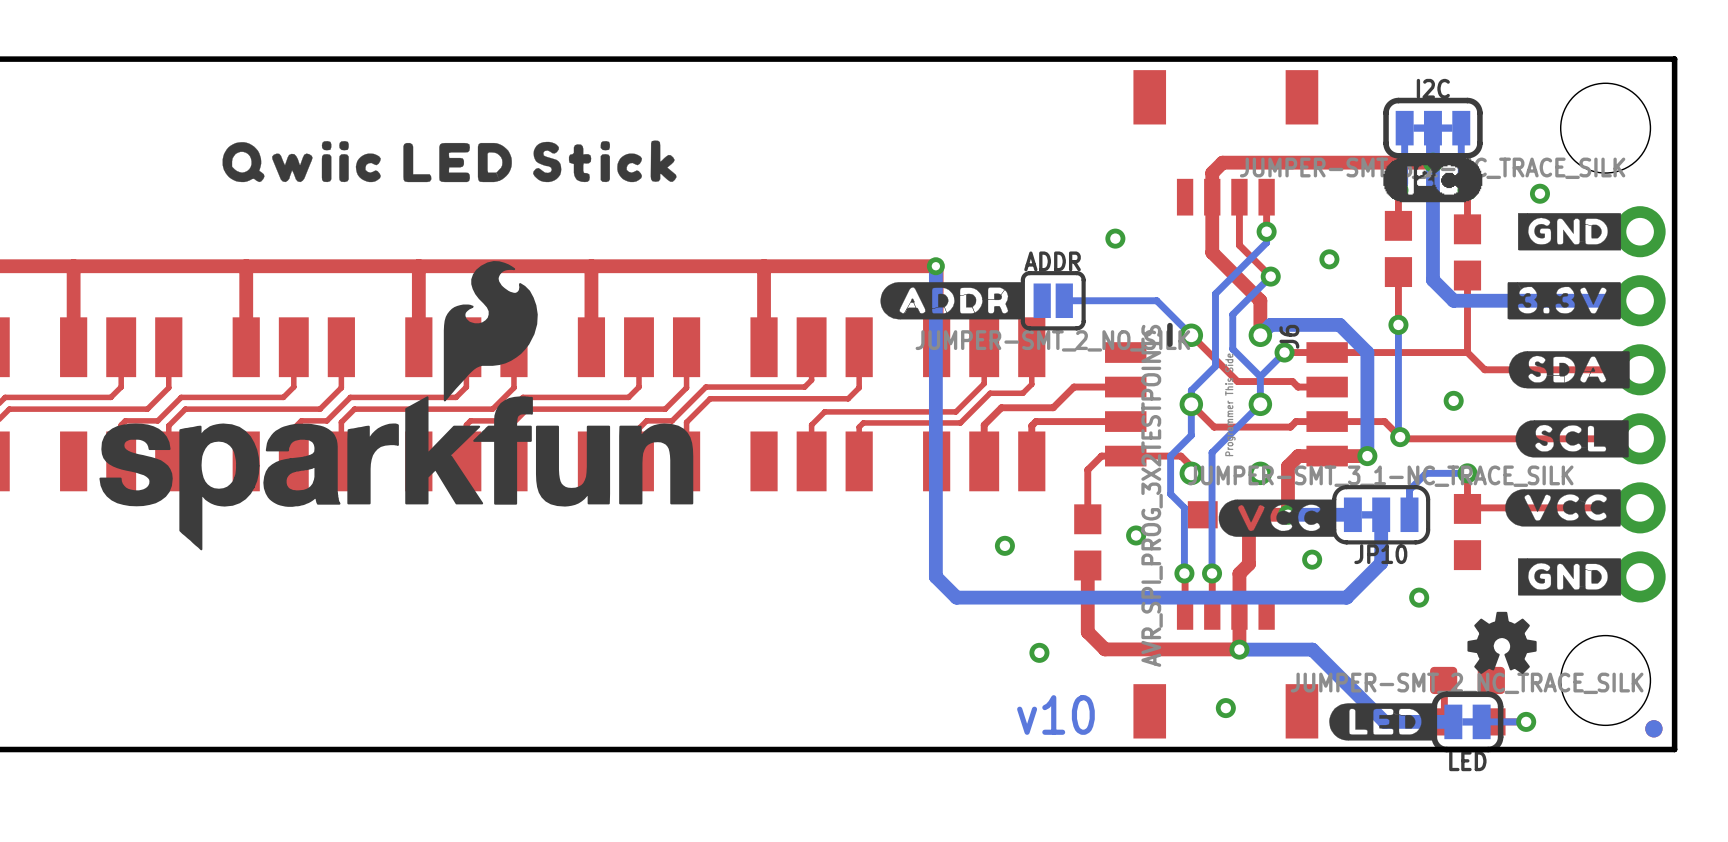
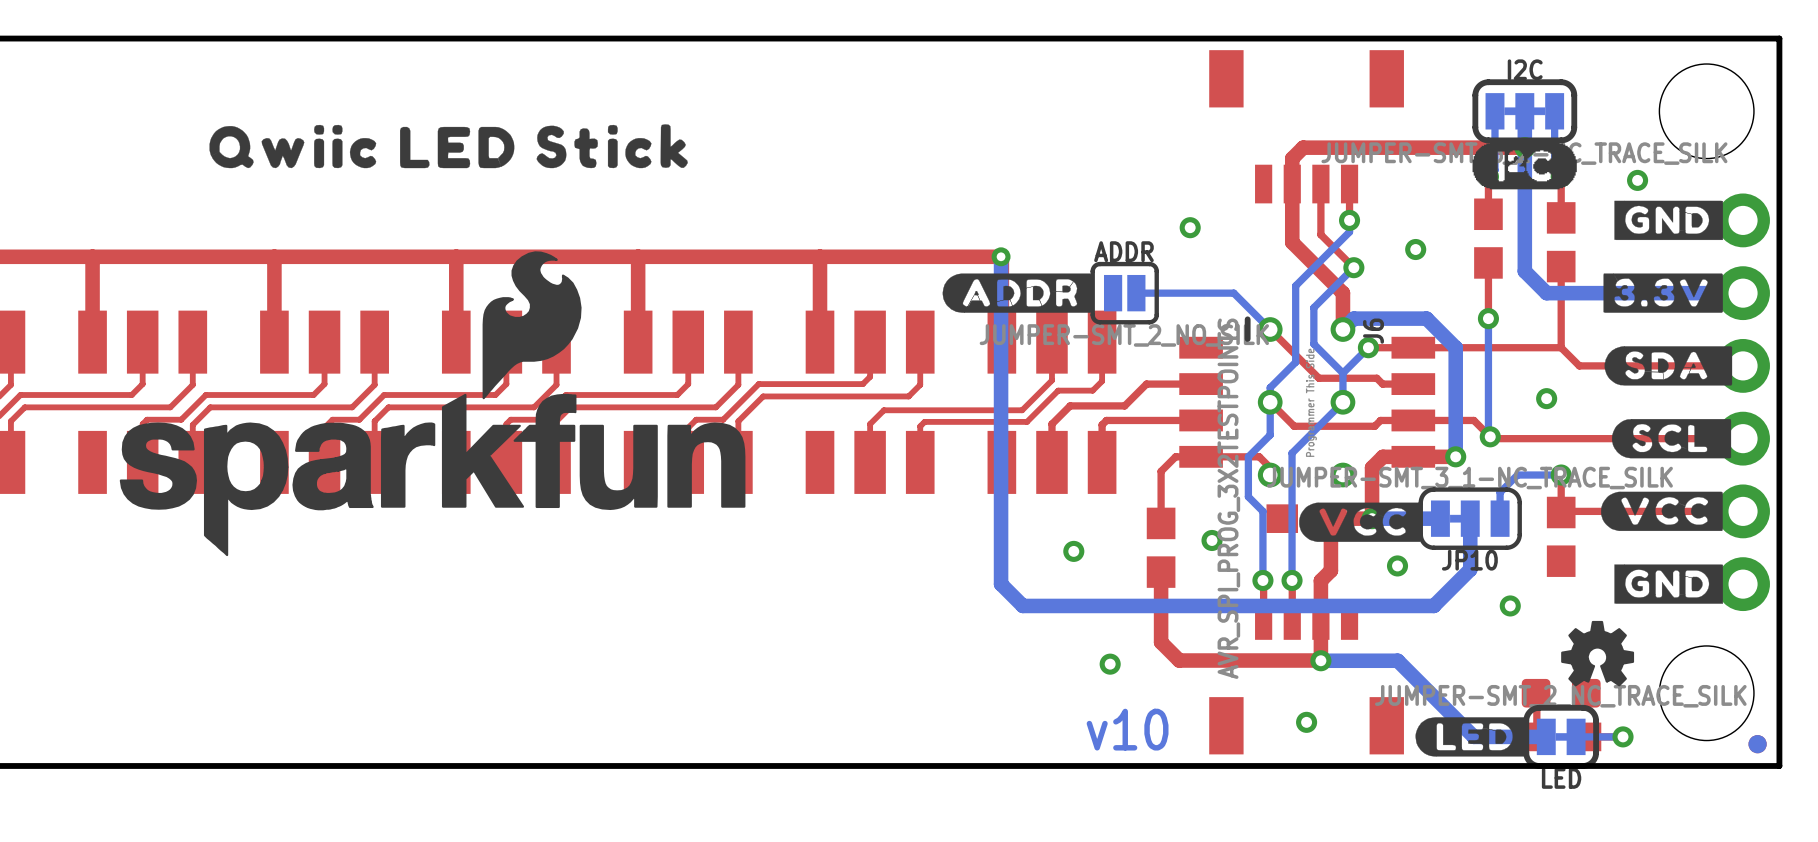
drawing position: (449, 161) -> (448, 146)

